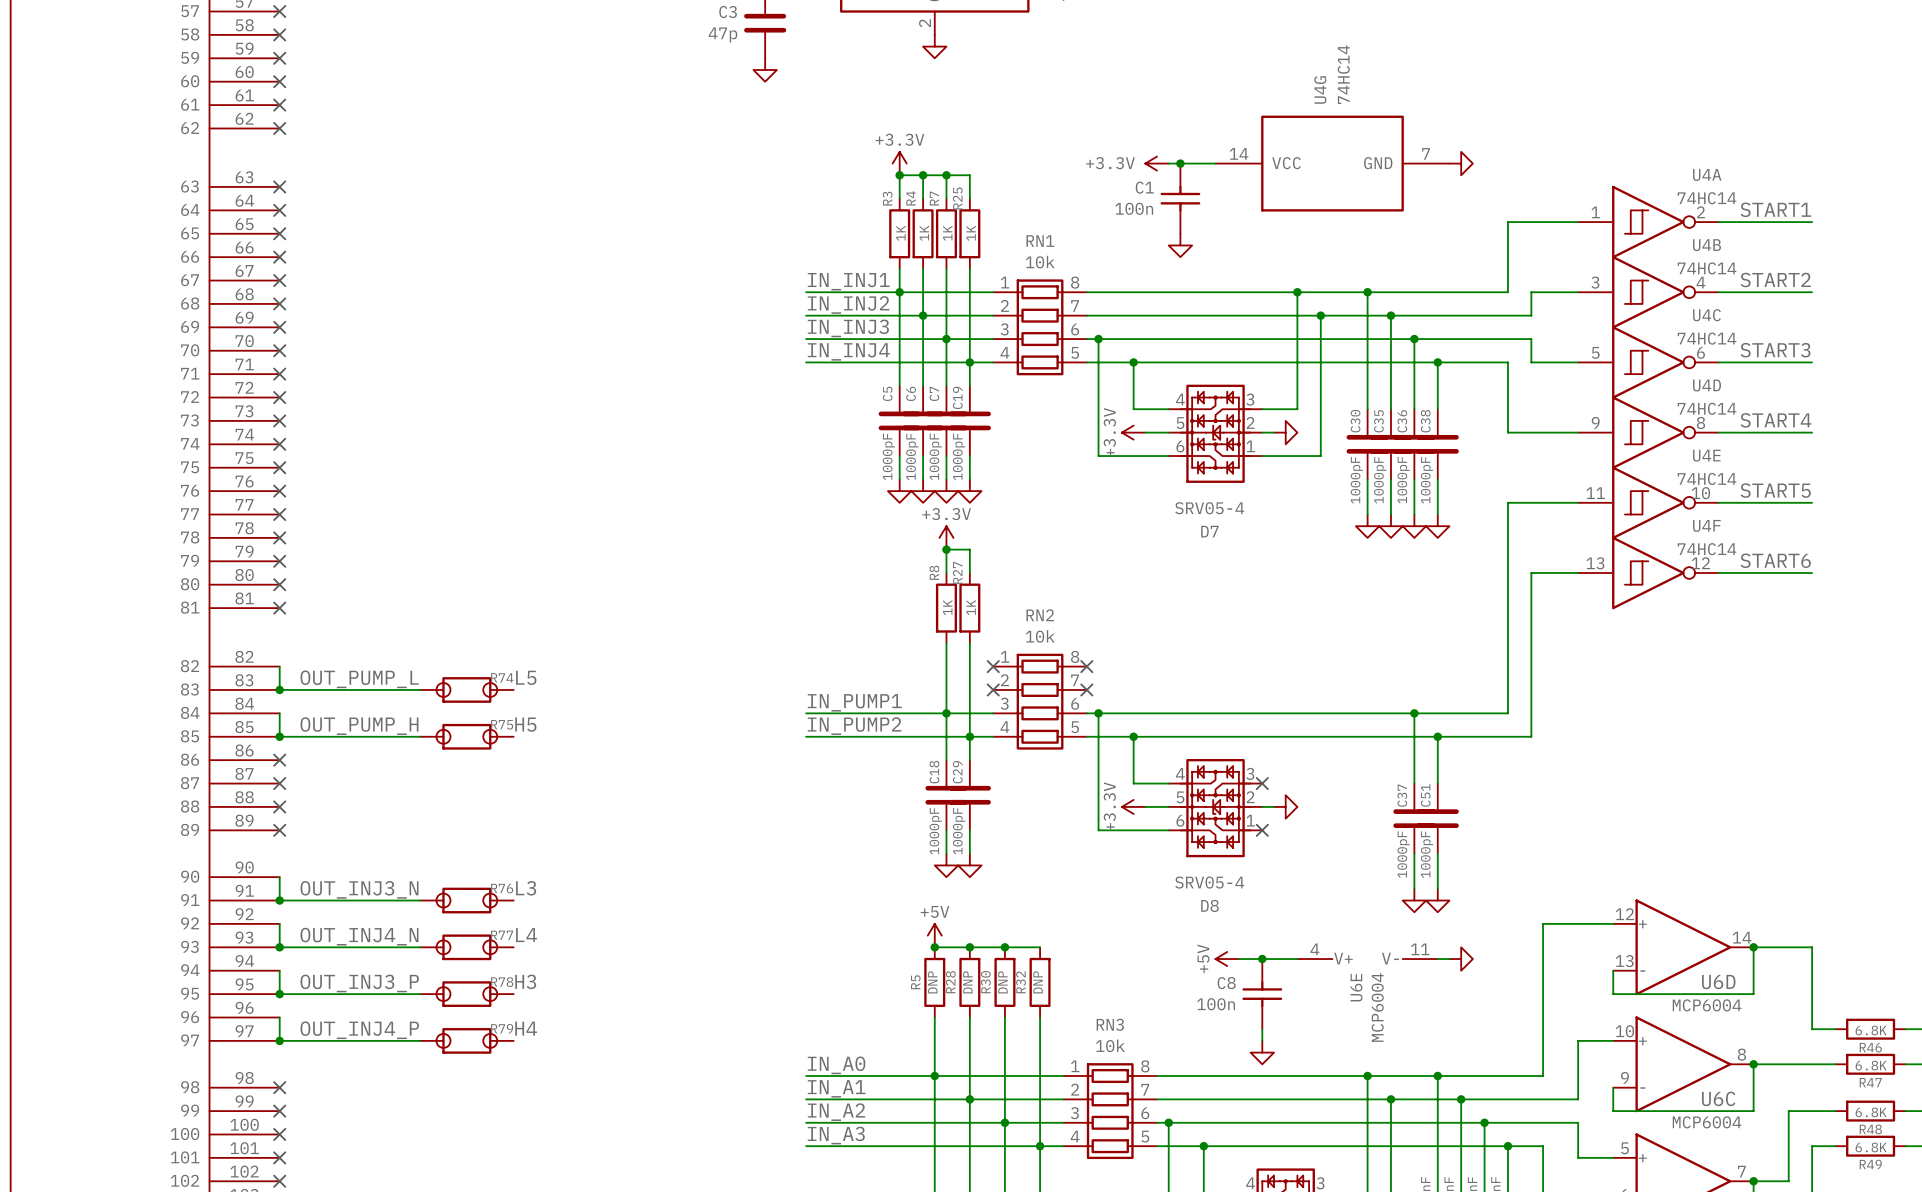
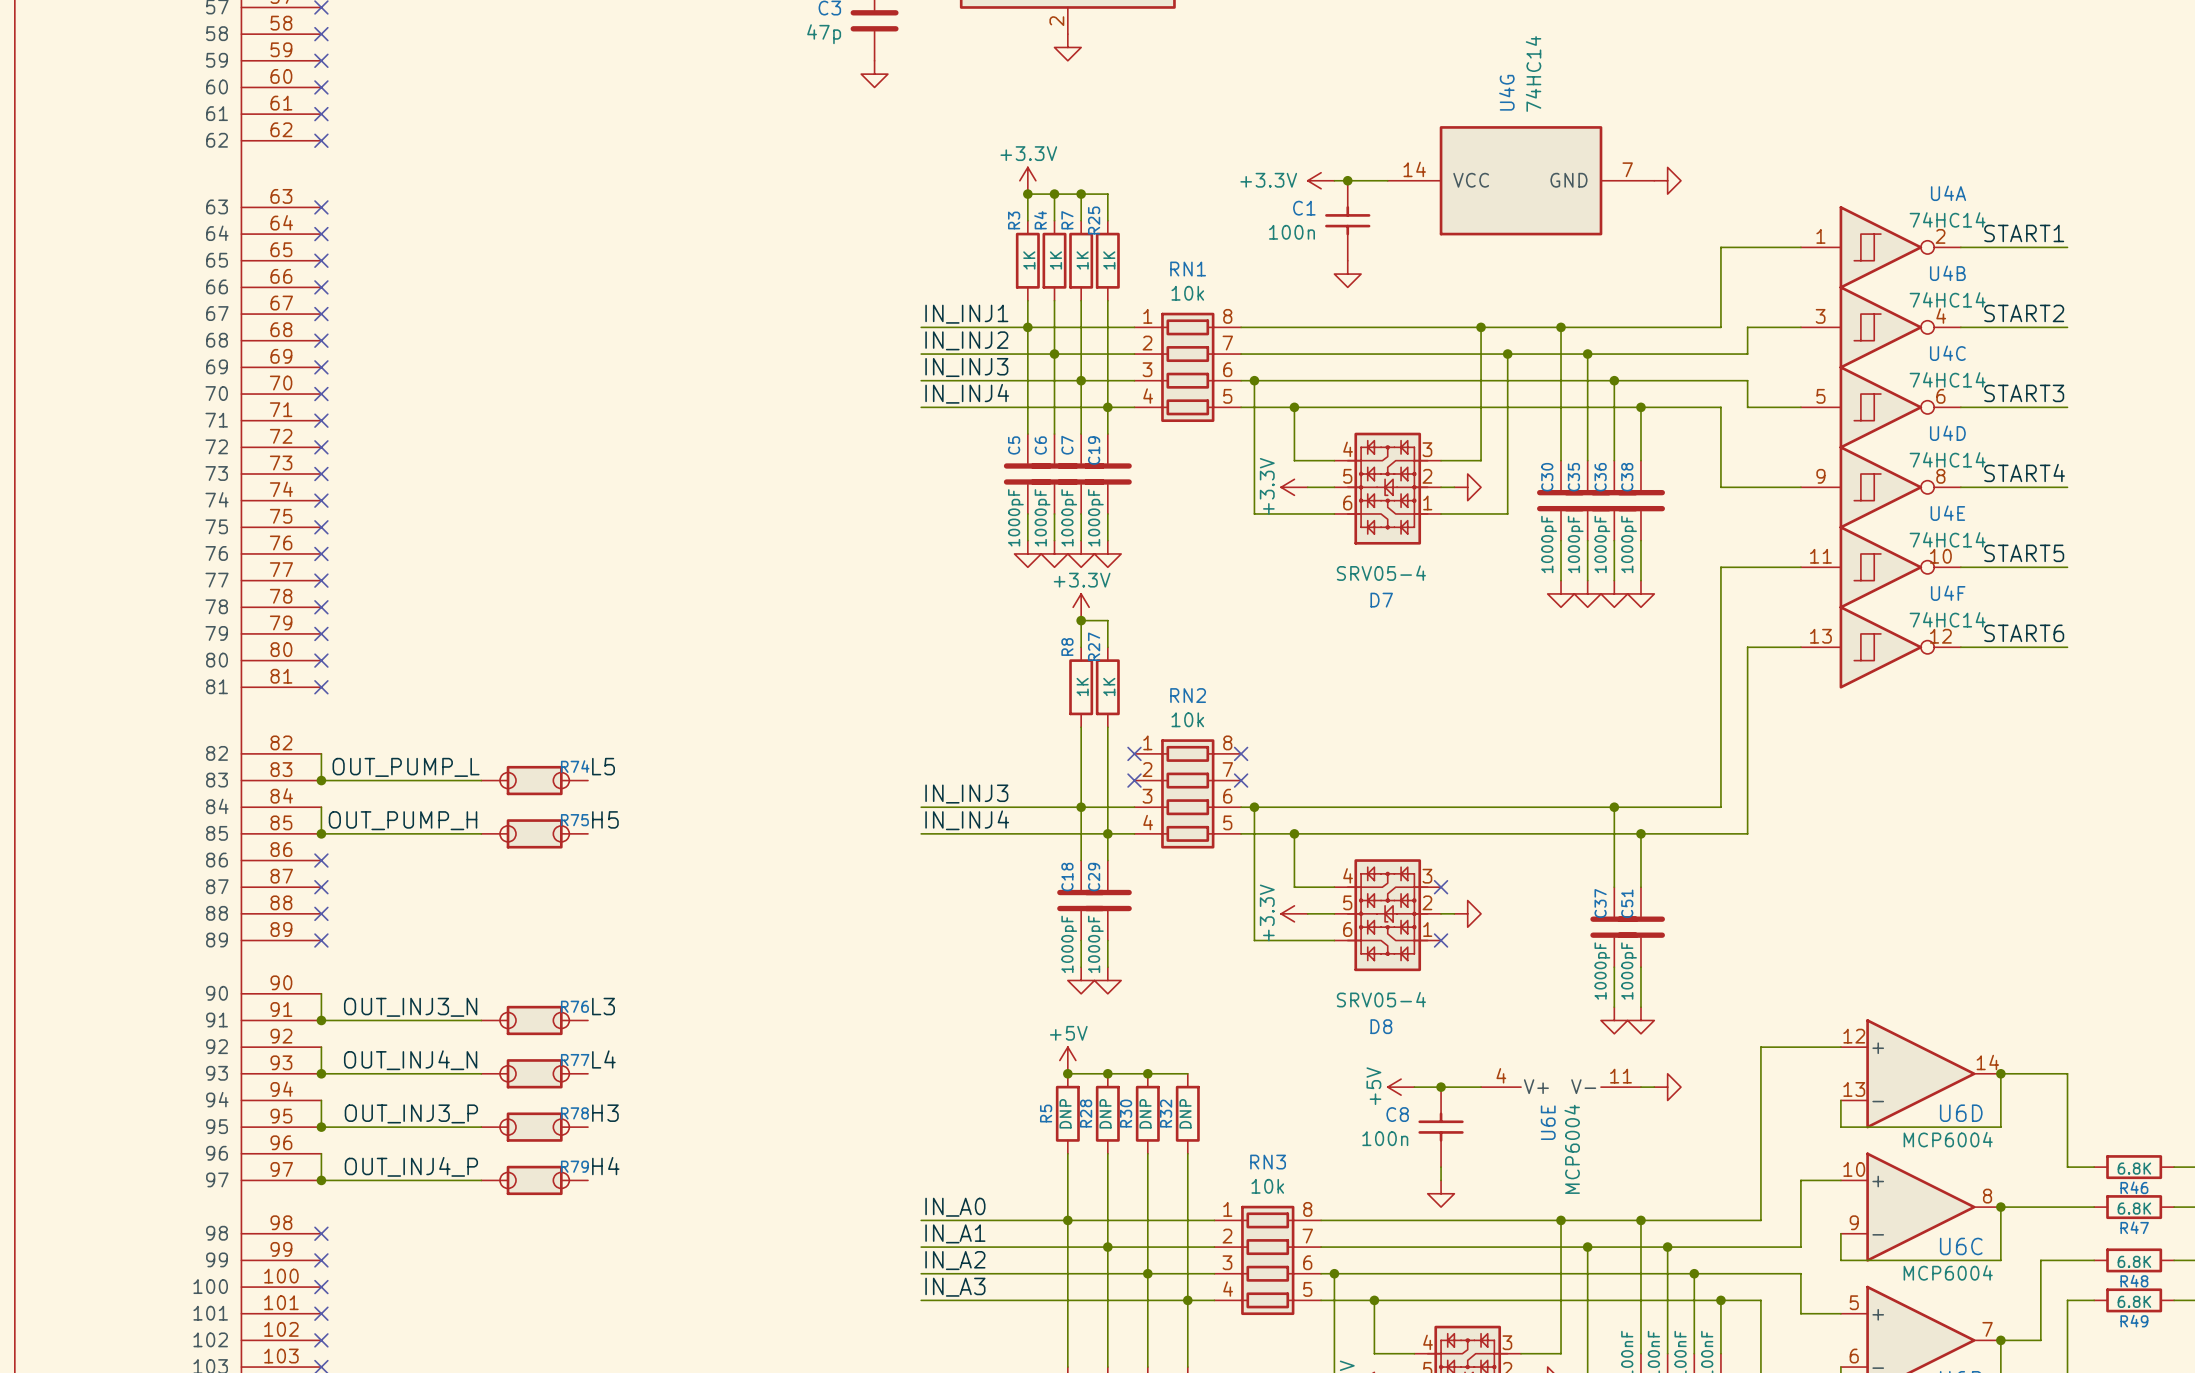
label: IN_PUMP1 (854, 702) -> IN_INJ3 (966, 794)
label: IN_PUMP2 (854, 726) -> IN_INJ4 (967, 820)

